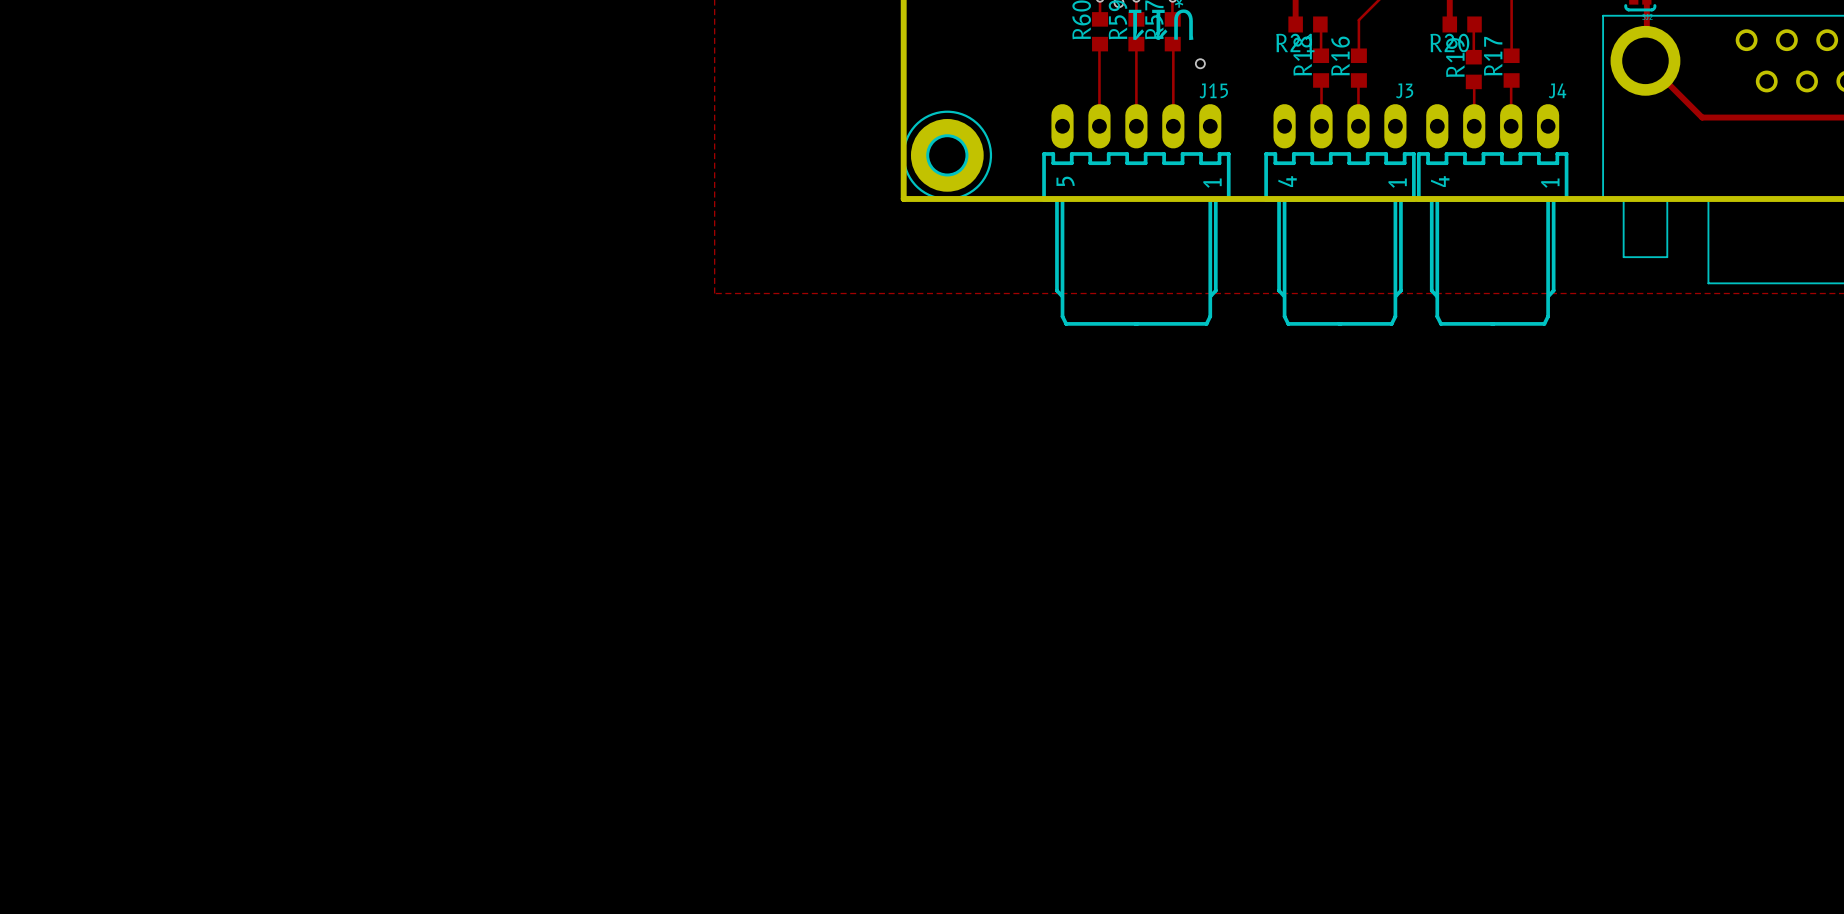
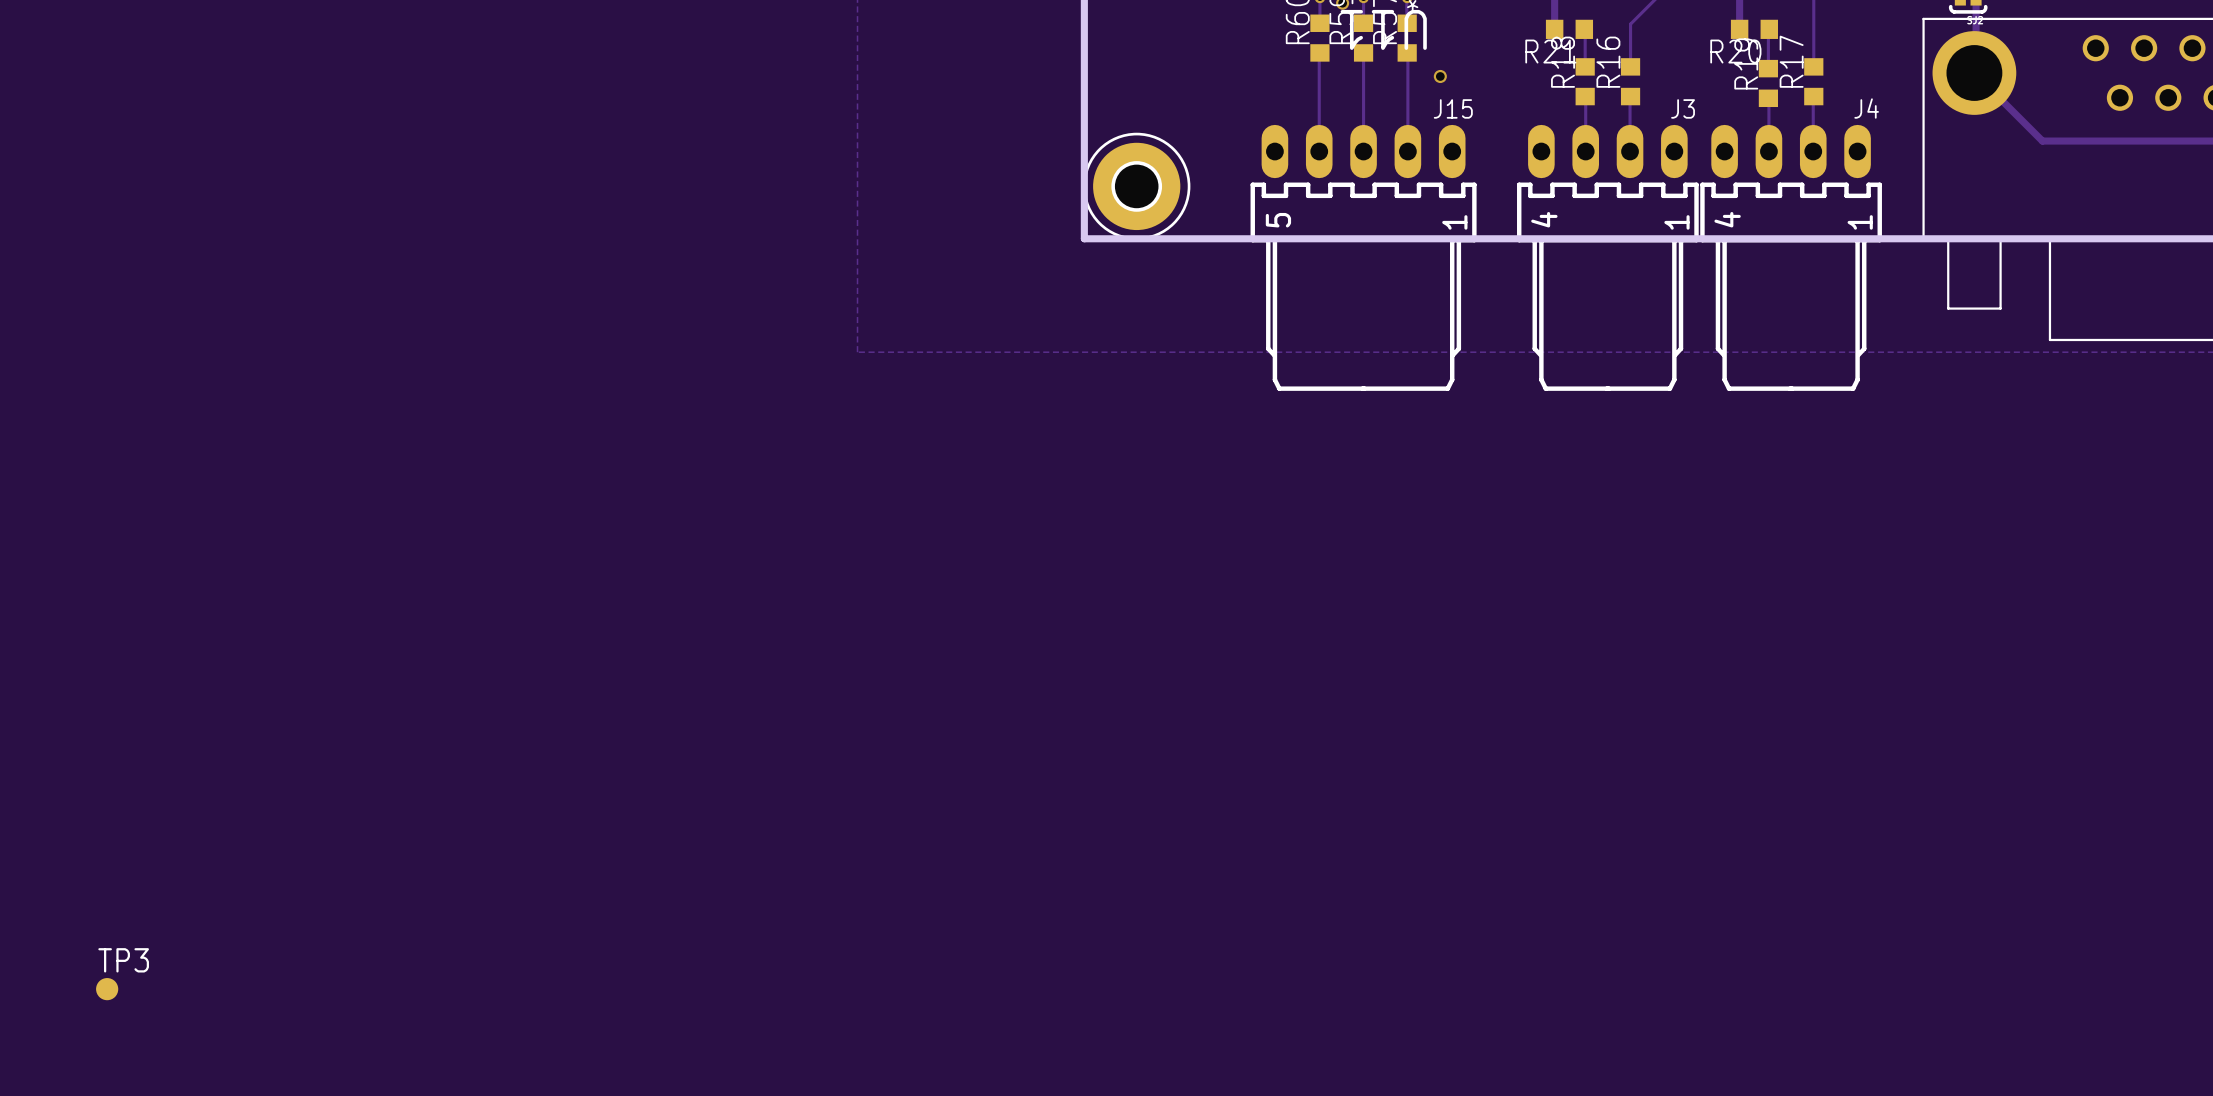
TP3: none -> (107, 989)

